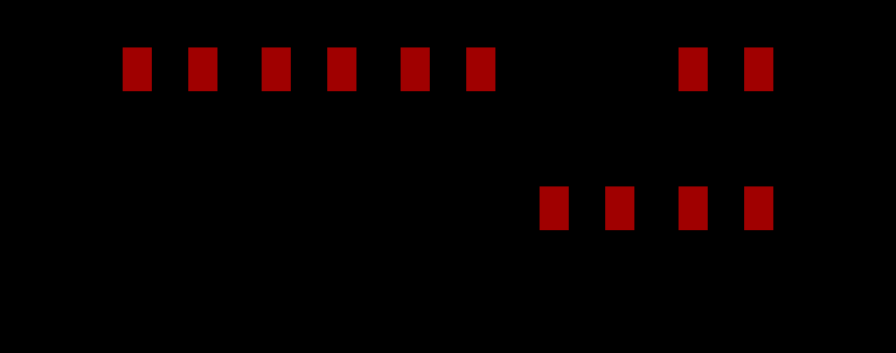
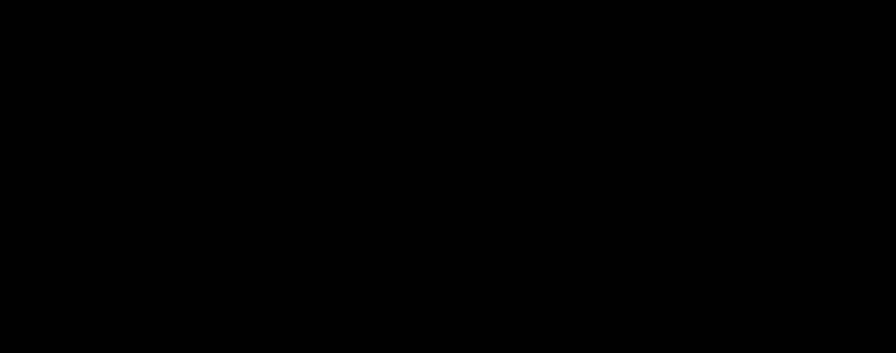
part: (170, 69) -> none
part: (309, 69) -> none
part: (448, 69) -> none
part: (725, 69) -> none
part: (586, 208) -> none
part: (725, 208) -> none

